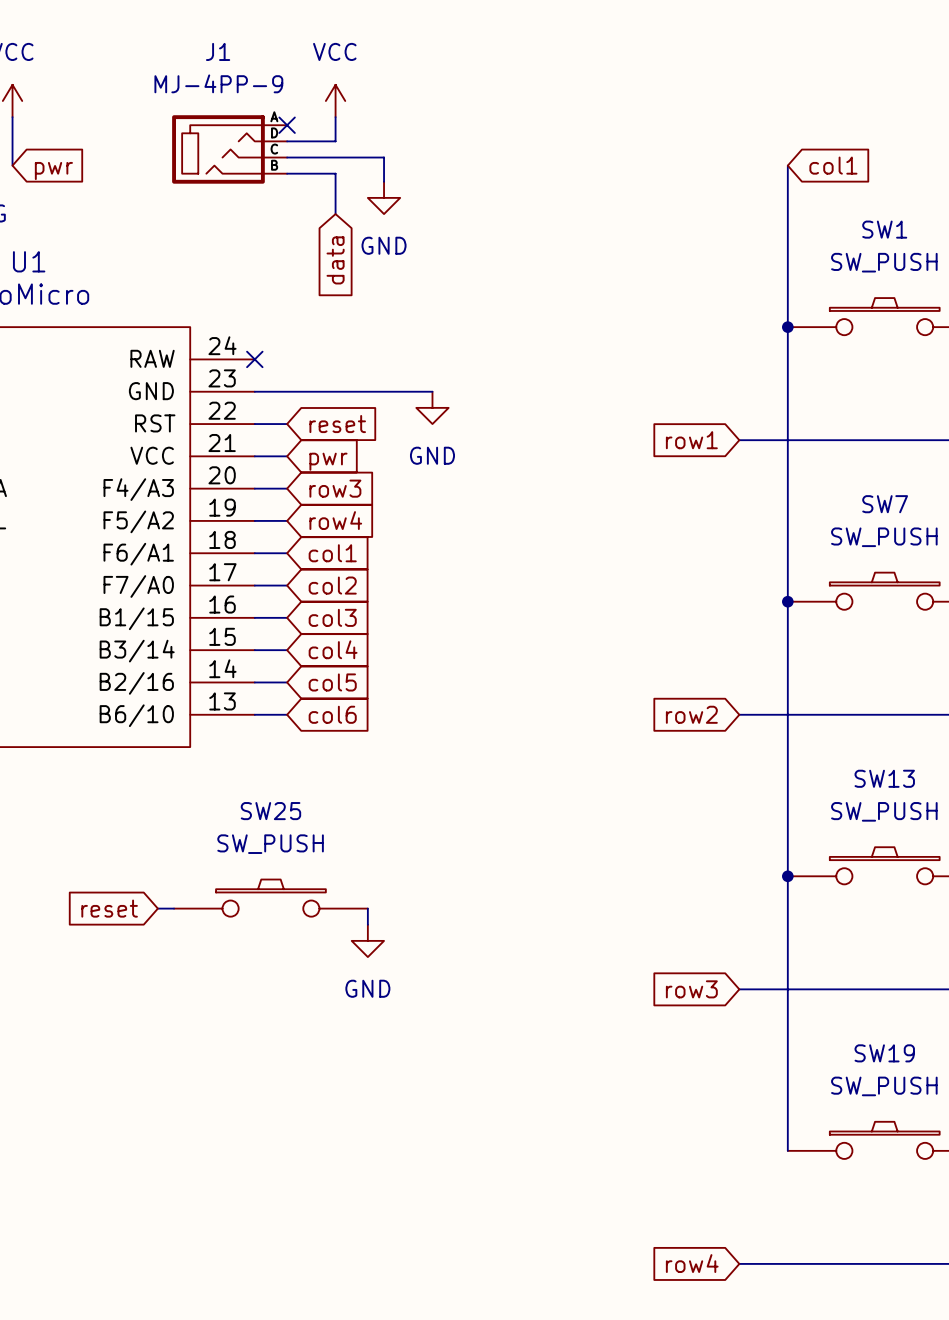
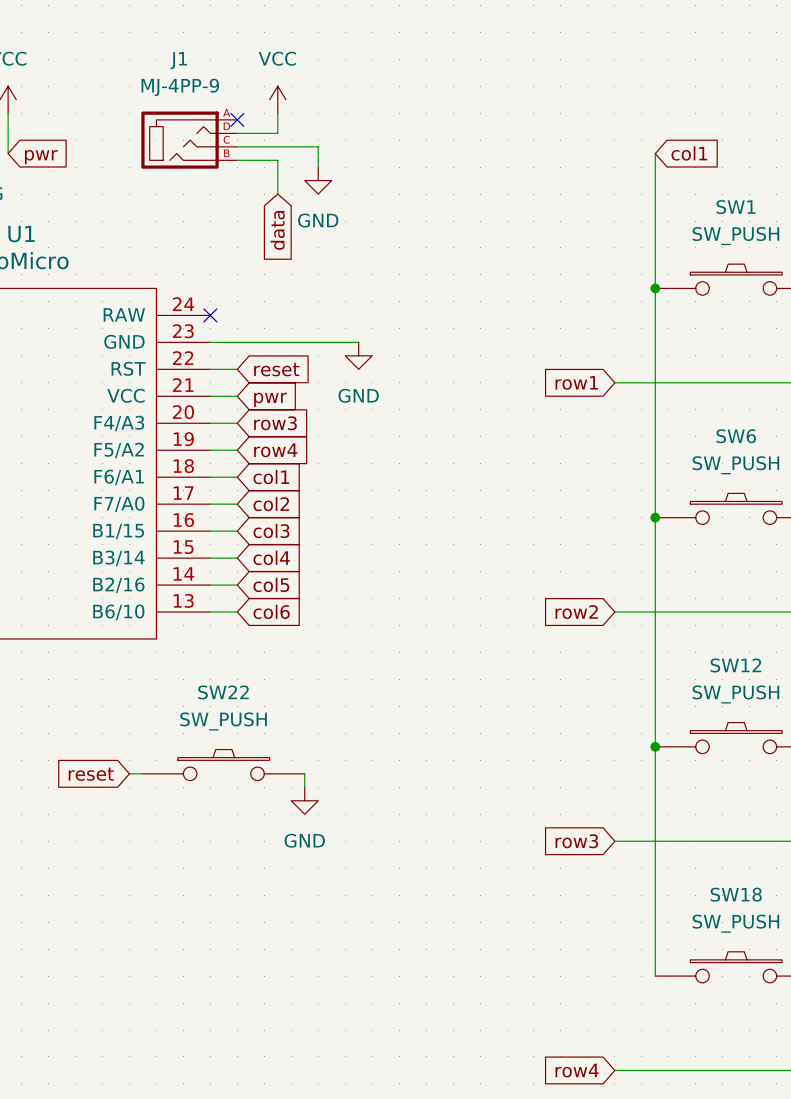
SW7 name: SW7 (885, 504) -> SW6 (736, 436)
SW13 name: SW13 (884, 778) -> SW12 (735, 665)
SW25 name: SW25 (270, 811) -> SW22 (223, 692)
SW19 name: SW19 (884, 1053) -> SW18 (736, 894)

